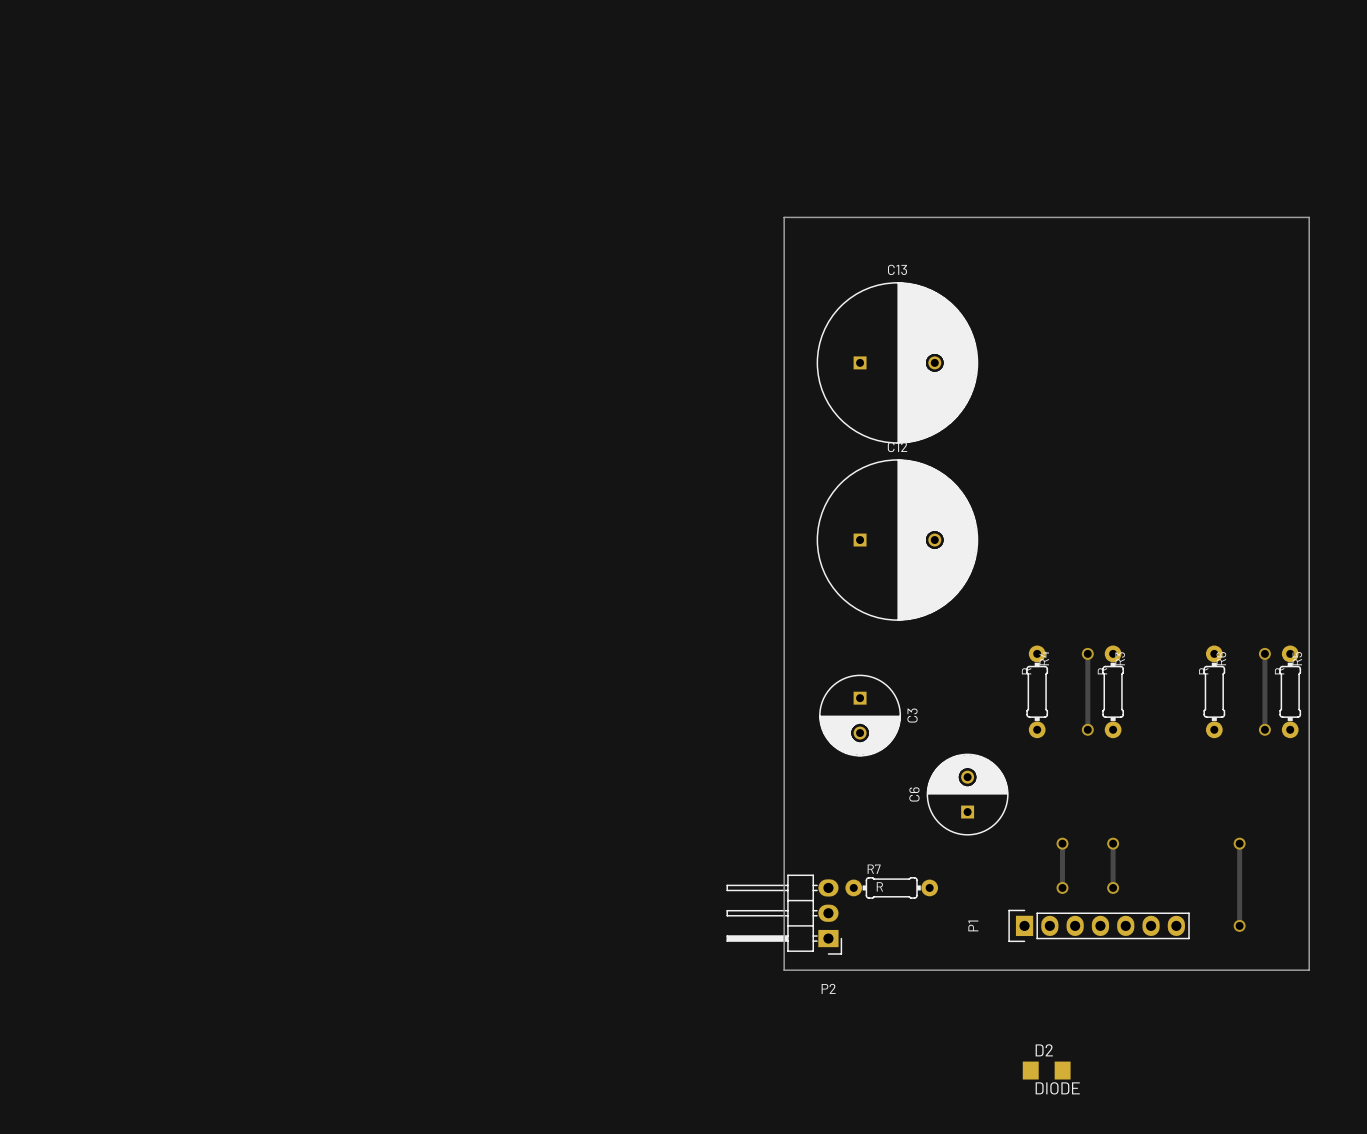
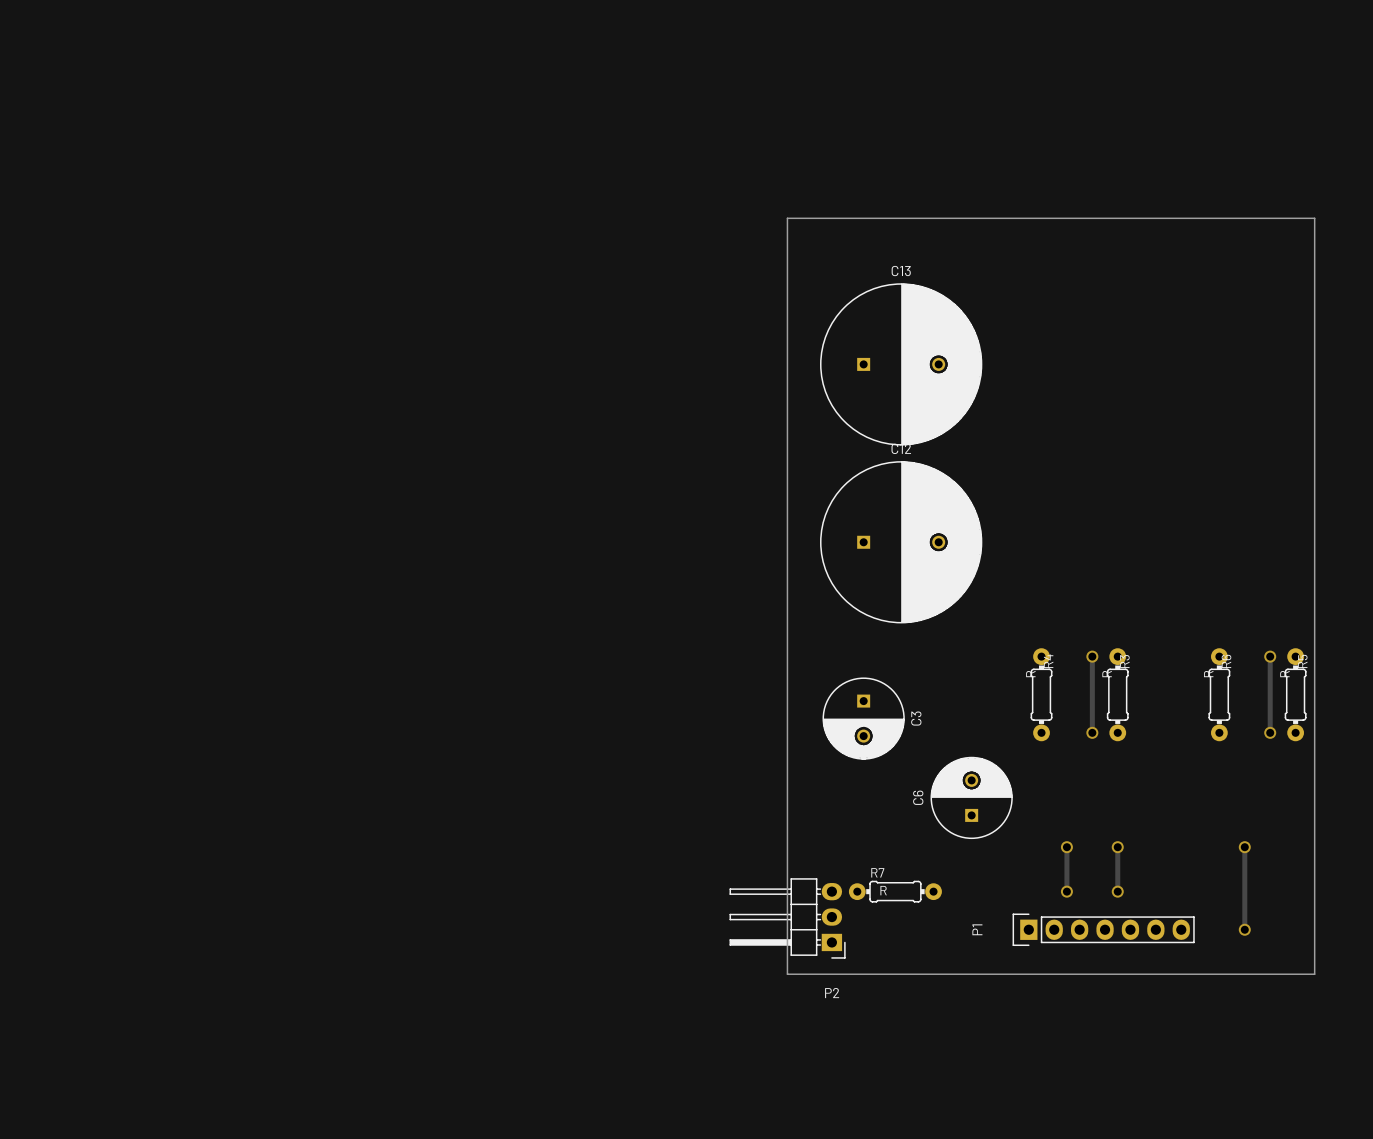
D2: DIODE (1046, 1070) -> none

